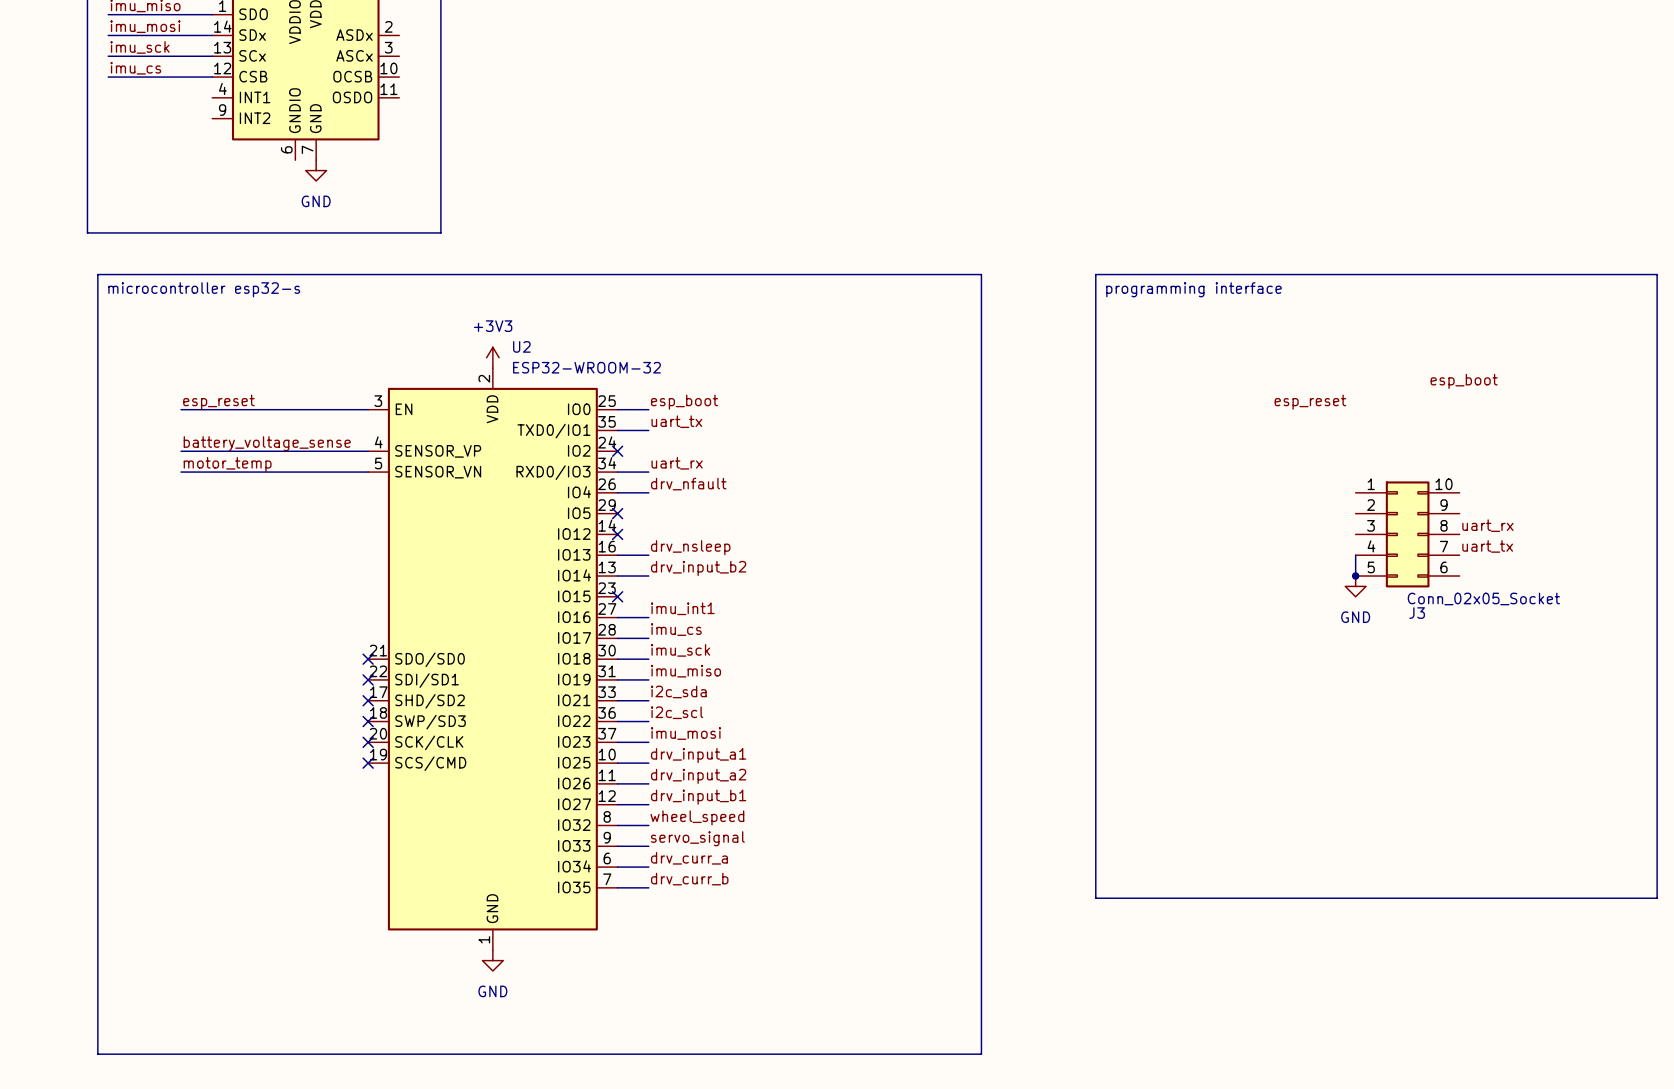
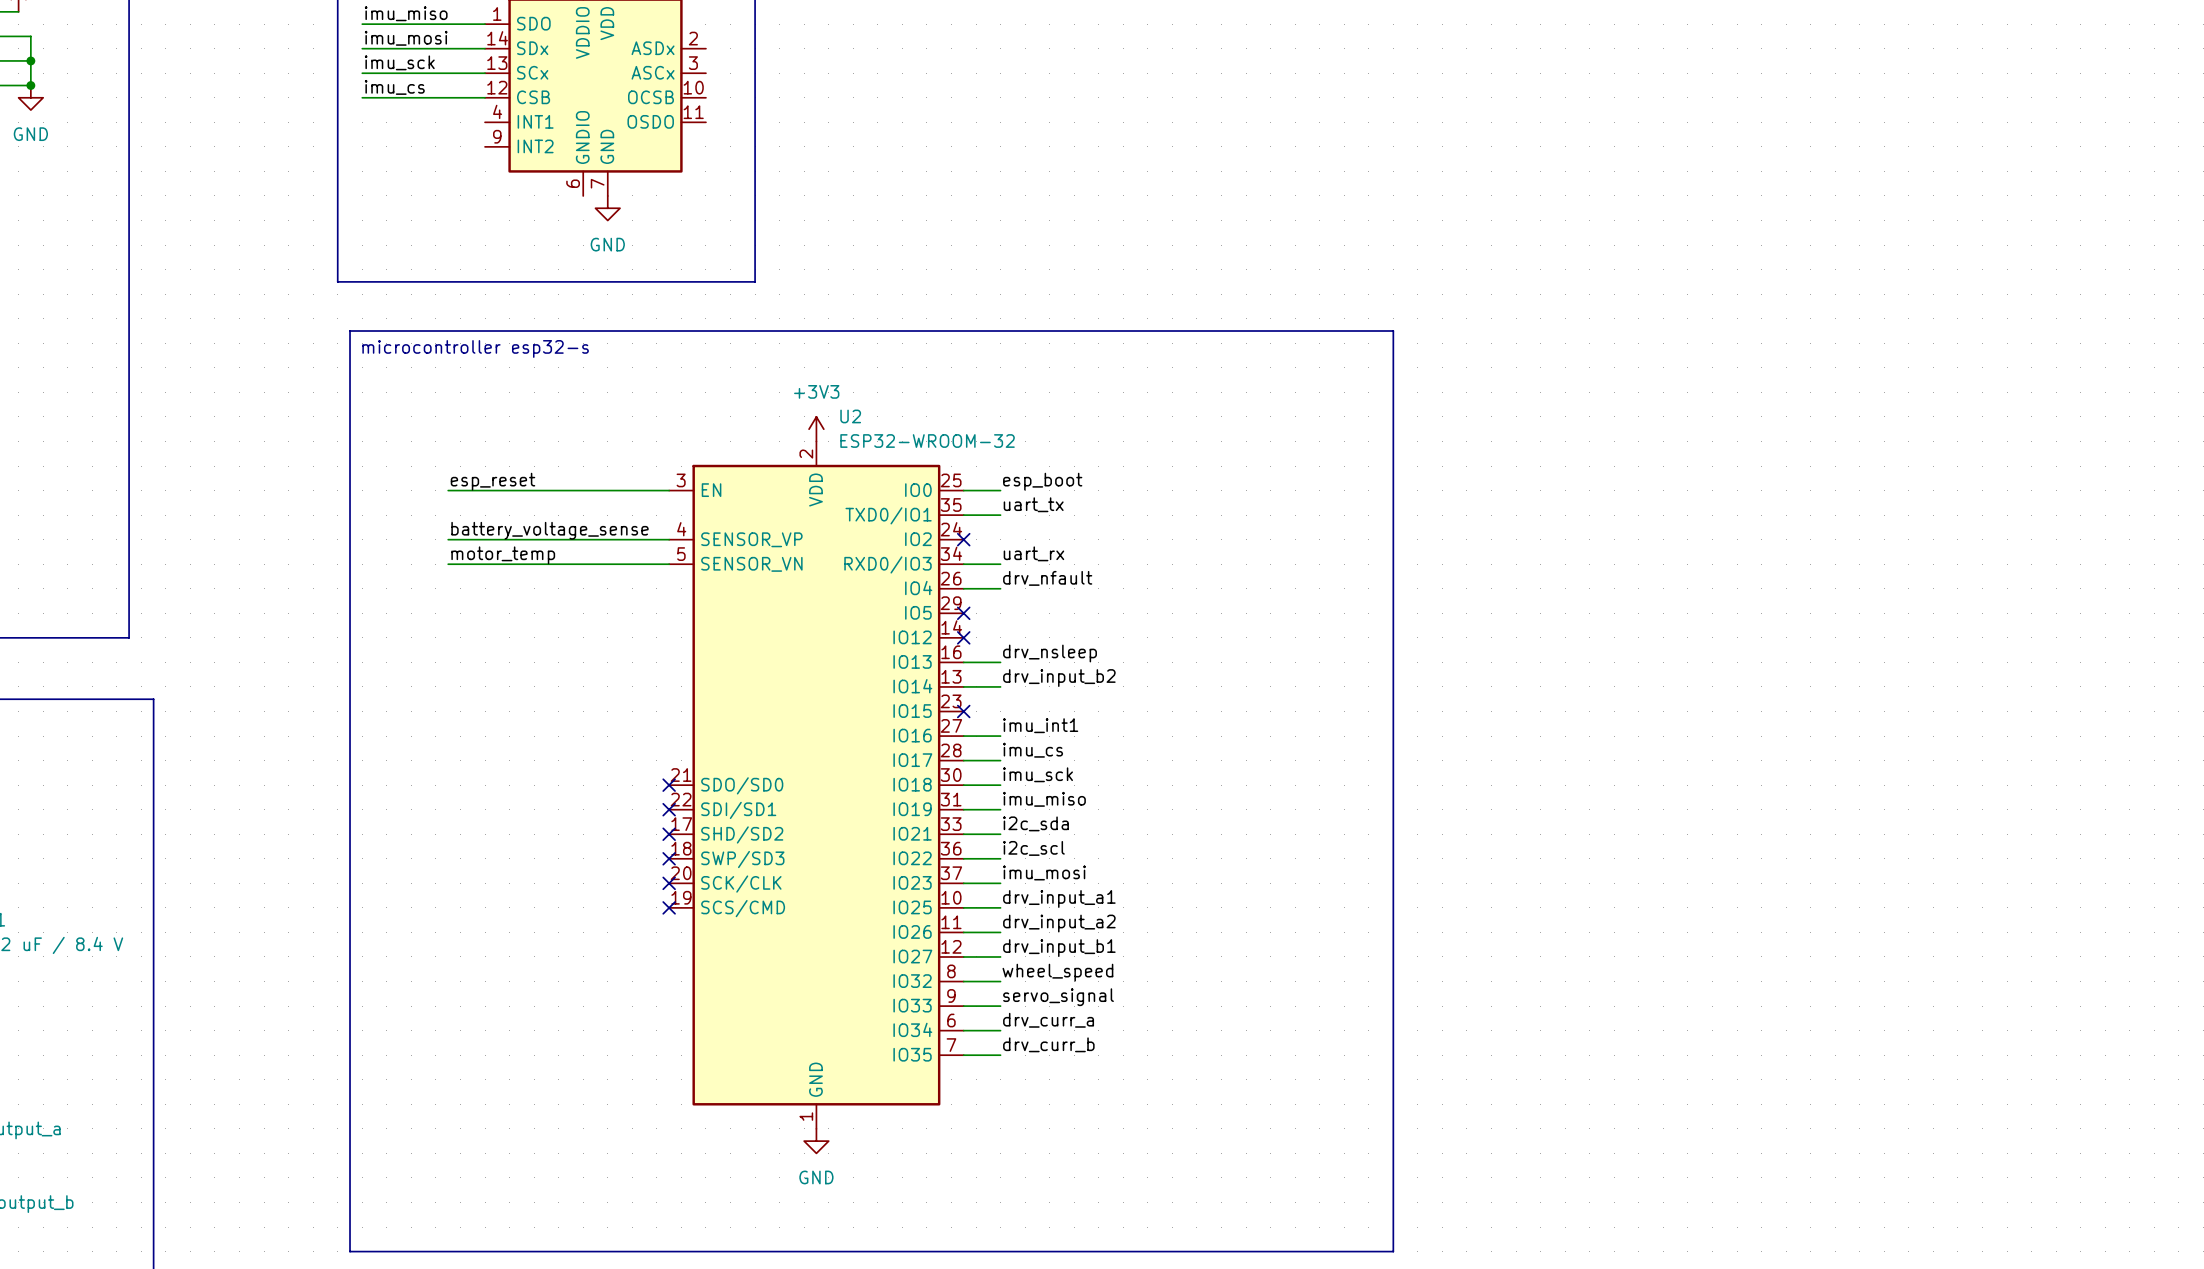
line: (1095, 274) (1657, 274) (1657, 898) (1095, 898) (1095, 274) -> none
text: programming interface (1194, 289) -> none
label: esp_boot (1464, 381) -> none
label: esp_reset (1310, 402) -> none
label: uart_rx (1487, 525) -> none
J3: Conn_02x05_Socket (1407, 534) -> none
label: uart_tx (1487, 546) -> none
wire: (1355, 555) (1355, 576) -> none
junction: (1355, 576) -> none
power symbol: GND (1355, 586) -> none

